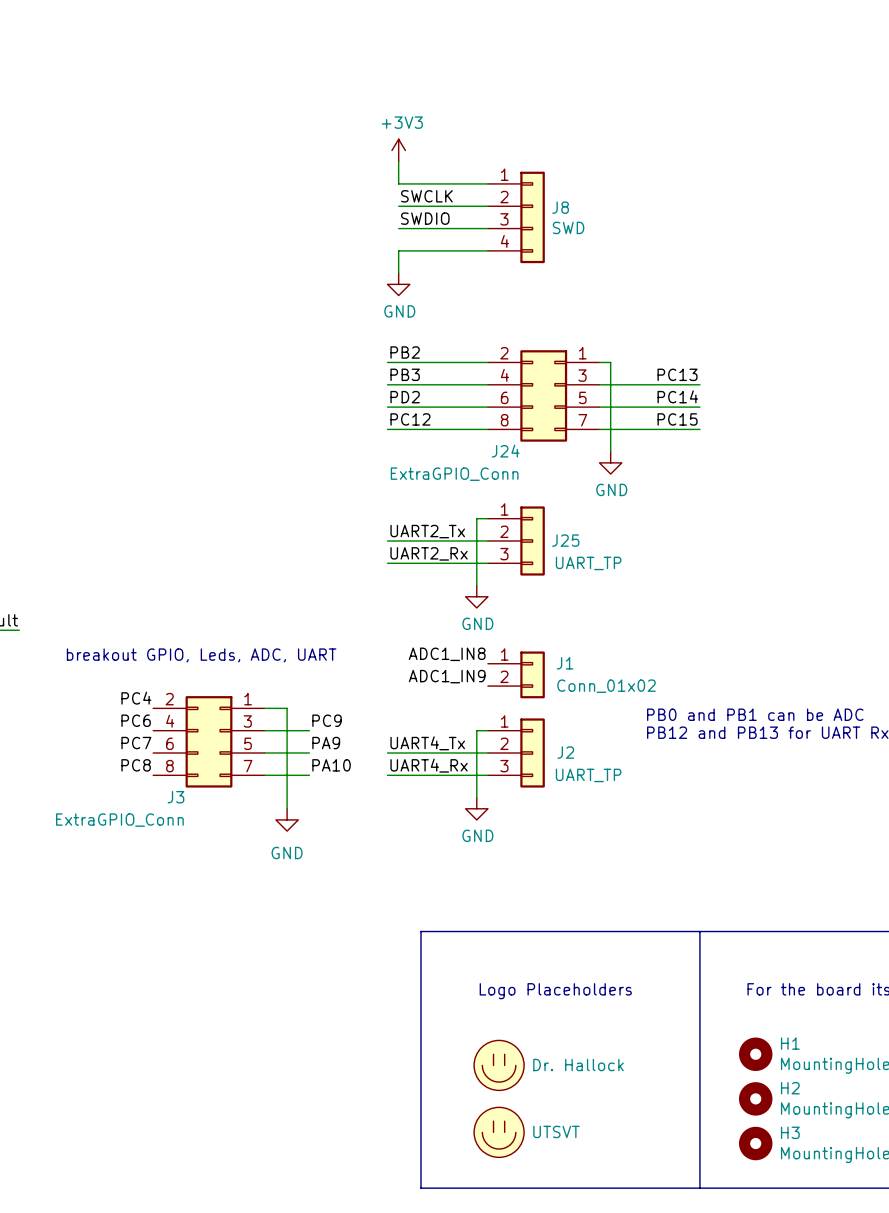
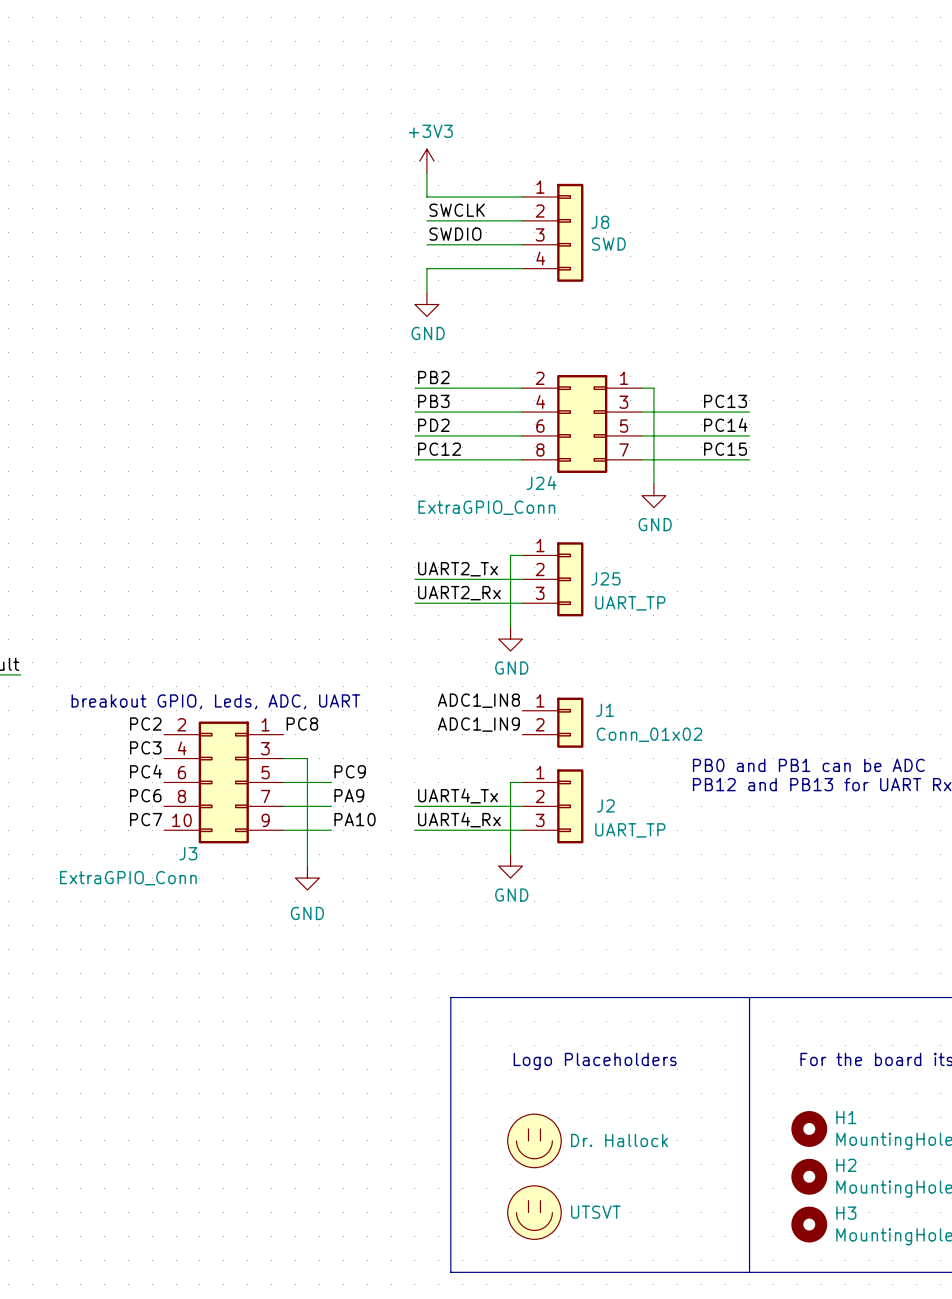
label: none -> PC2 (145, 724)
label: none -> PC8 (302, 724)
J3 symbol: [153, 696, 265, 788] -> [164, 721, 284, 844]
label: PC4 (136, 698) -> PC3 (145, 747)
label: PC6 (136, 720) -> PC4 (146, 771)
label: PC7 (136, 743) -> PC6 (145, 795)
label: PC8 (136, 765) -> PC7 (146, 819)

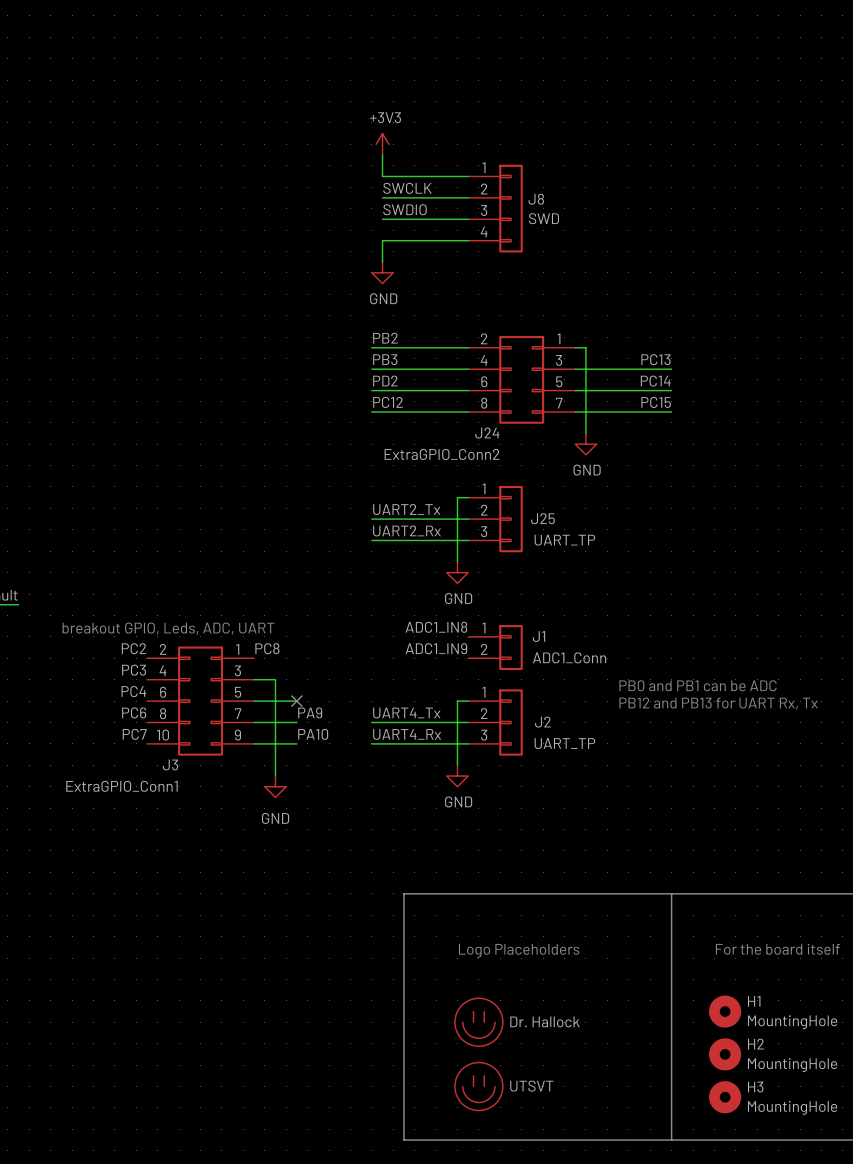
J24 value: ExtraGPIO_Conn (486, 507) -> ExtraGPIO_Conn2 (442, 454)
J1 value: Conn_01x02 (649, 734) -> ADC1_Conn (569, 657)
label: PC9 (350, 771) -> none
no-connect mark: none -> (296, 701)
J3 value: ExtraGPIO_Conn (128, 878) -> ExtraGPIO_Conn1 (121, 786)

